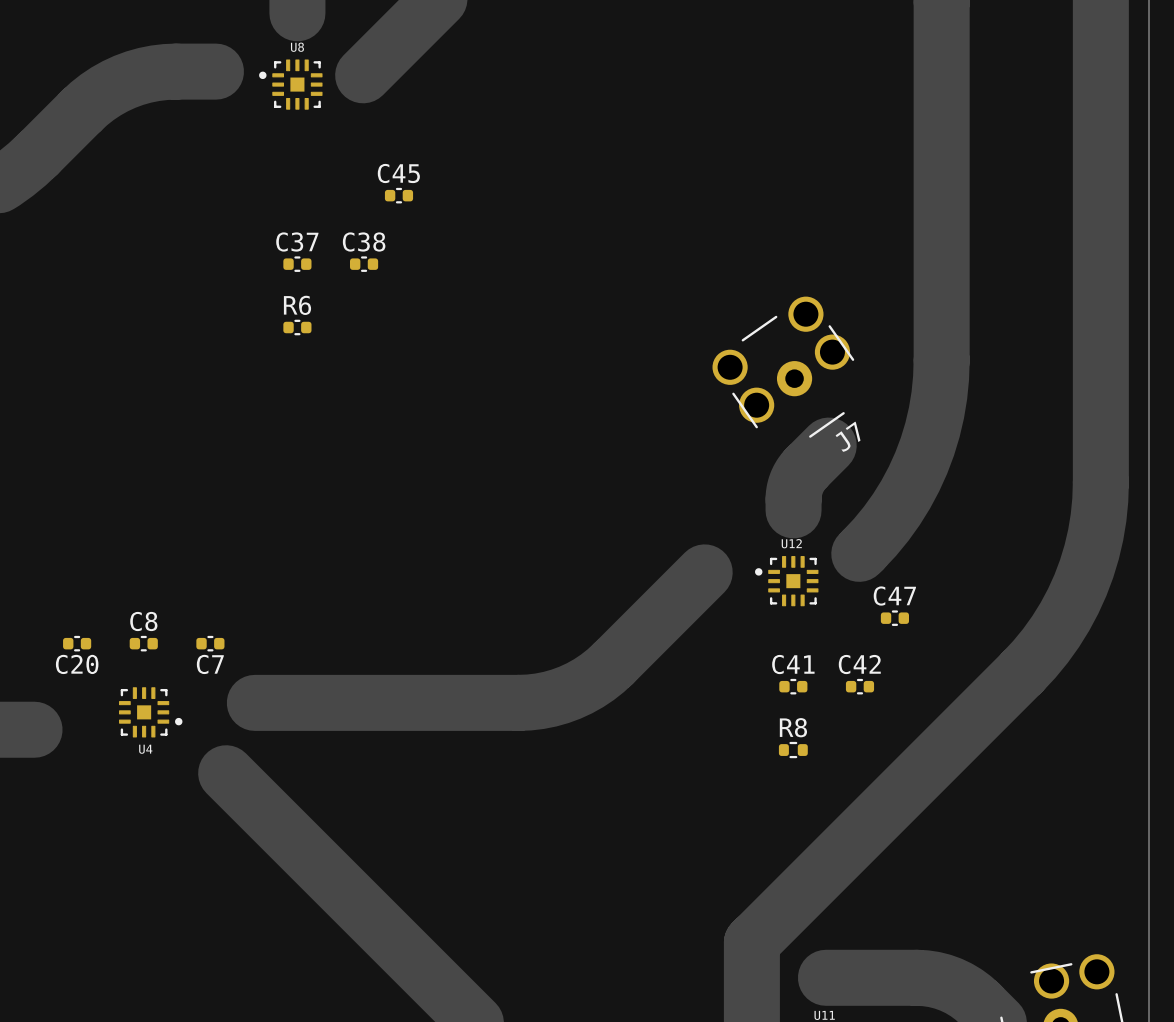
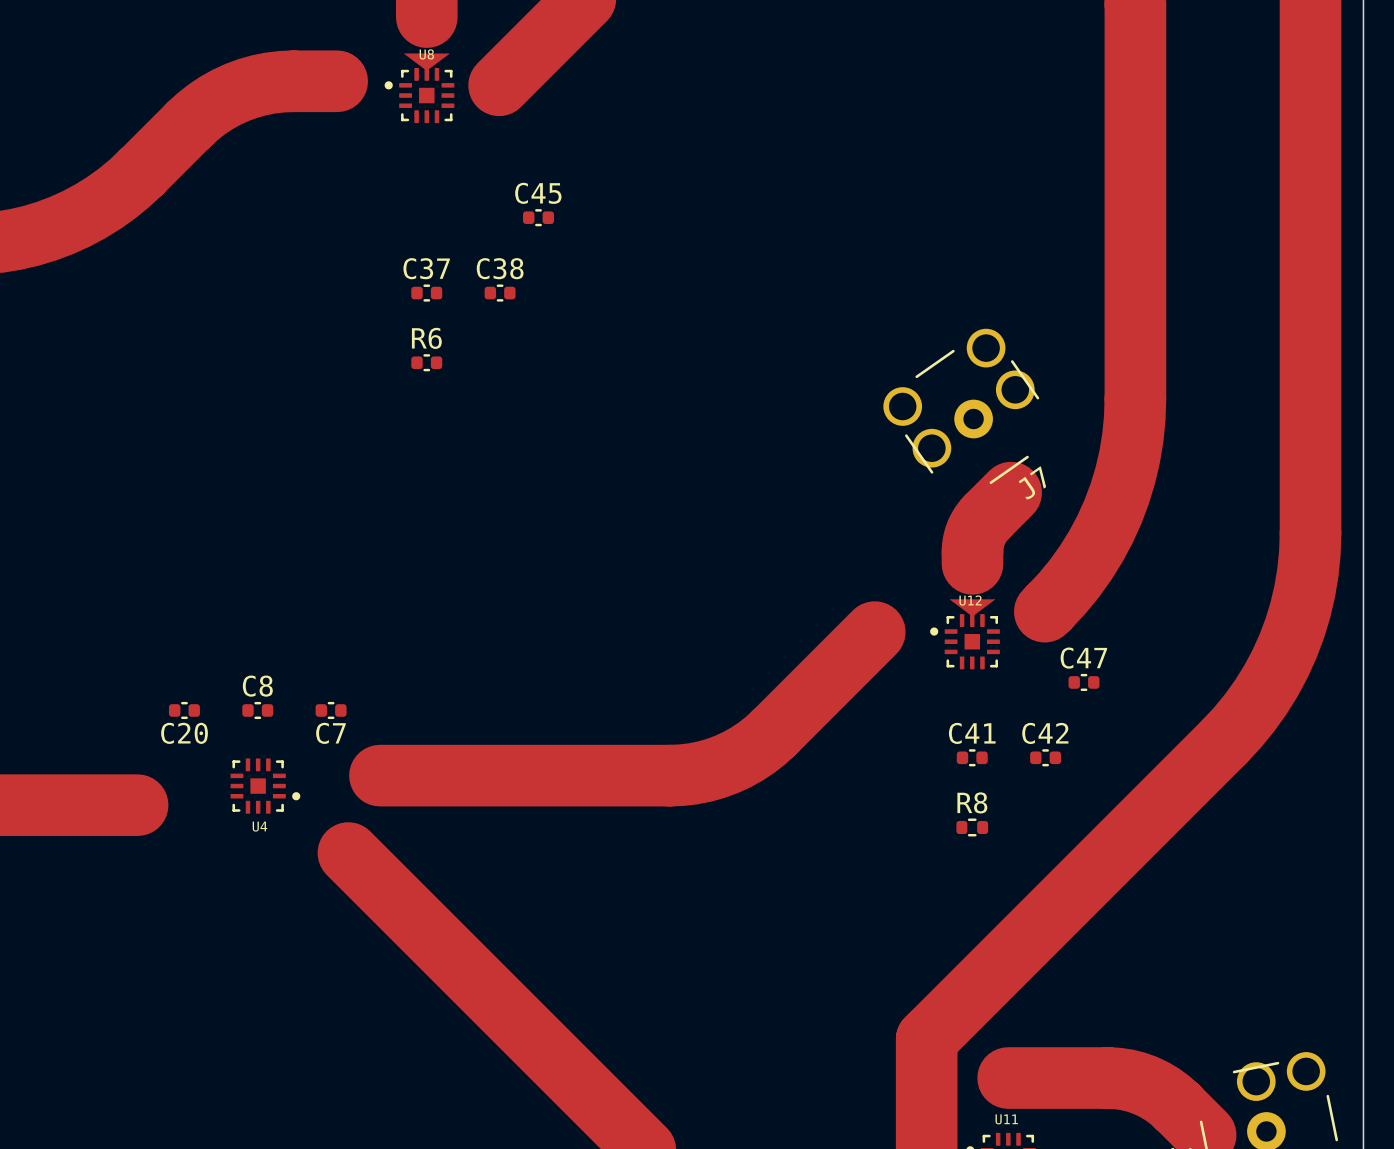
drawing: none -> [404, 53, 450, 70]
drawing: none -> [949, 599, 996, 615]

